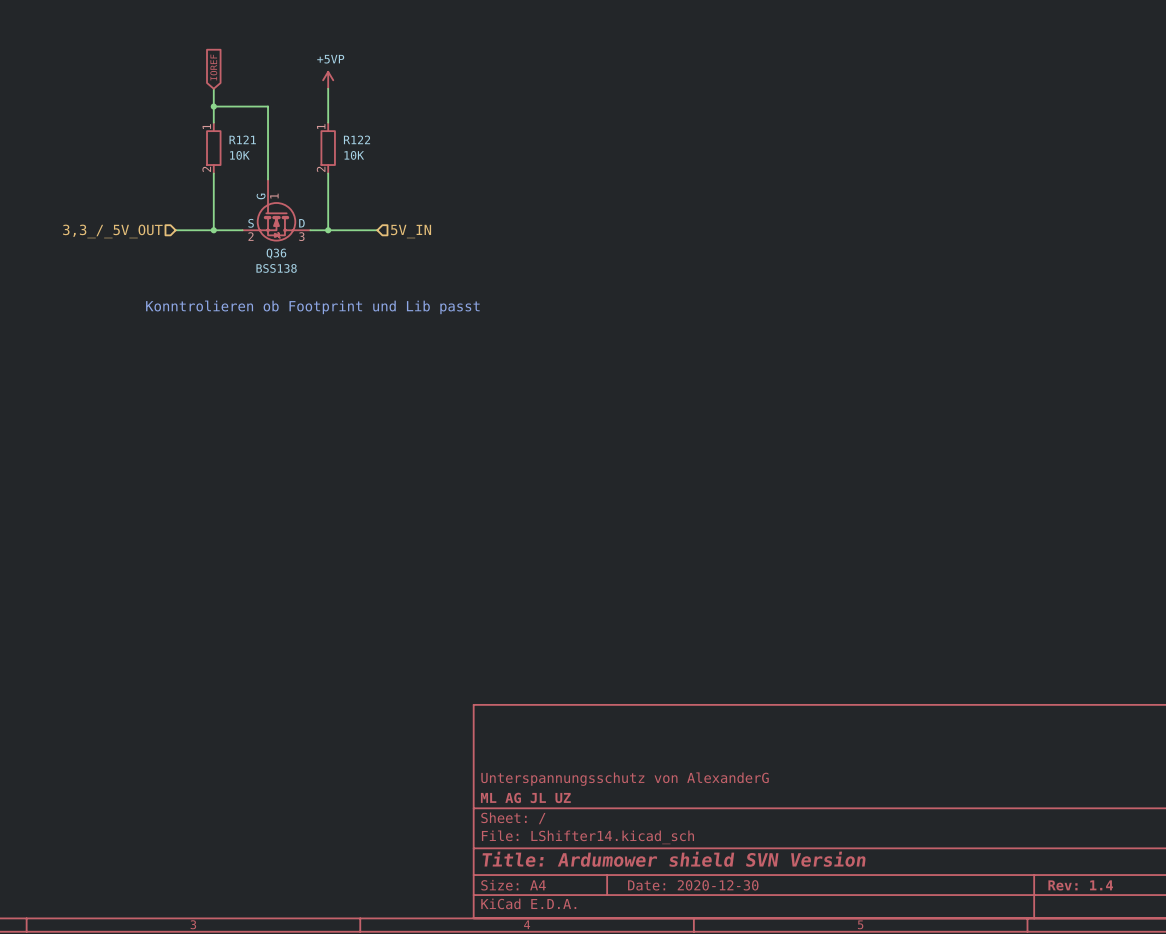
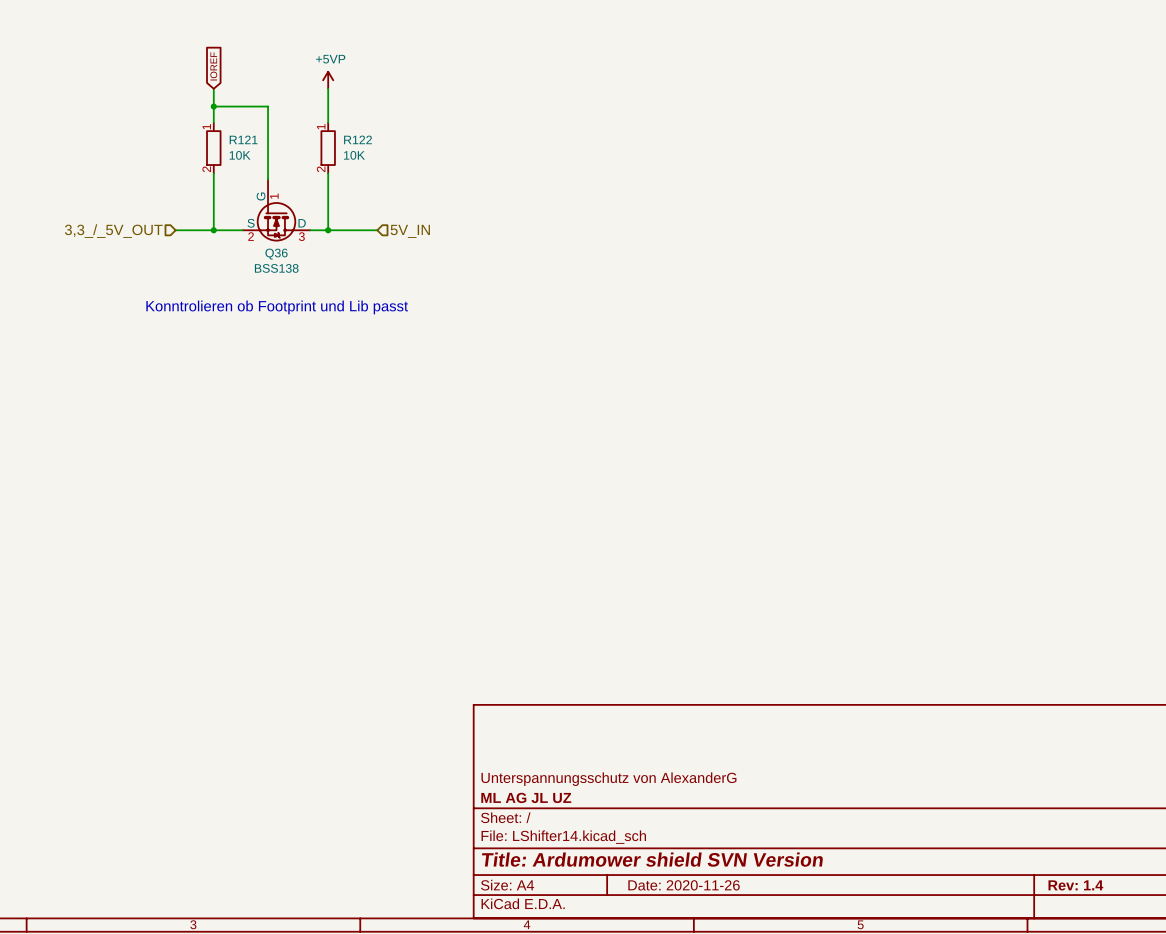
title block: Date: 2020-12-30 (693, 885) -> Date: 2020-11-26 (684, 885)

